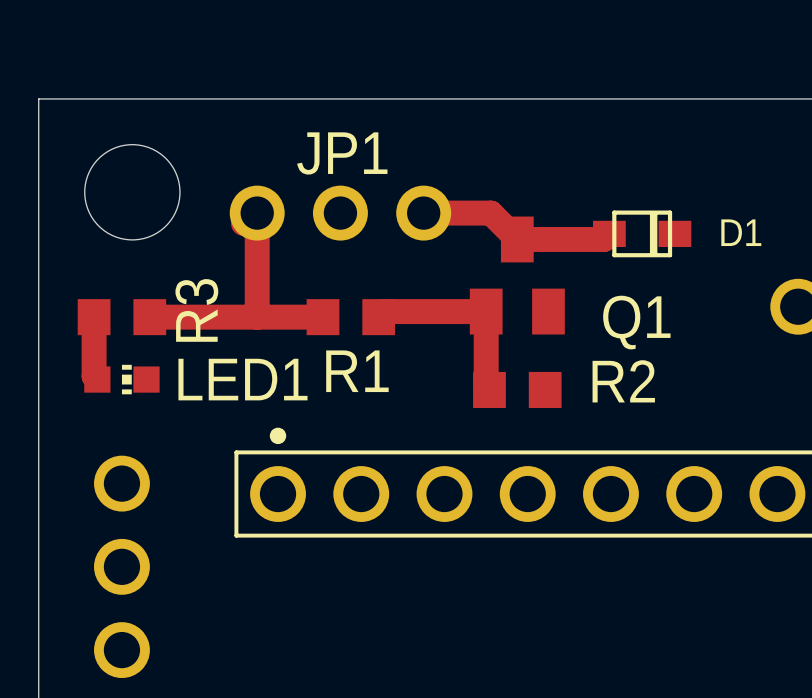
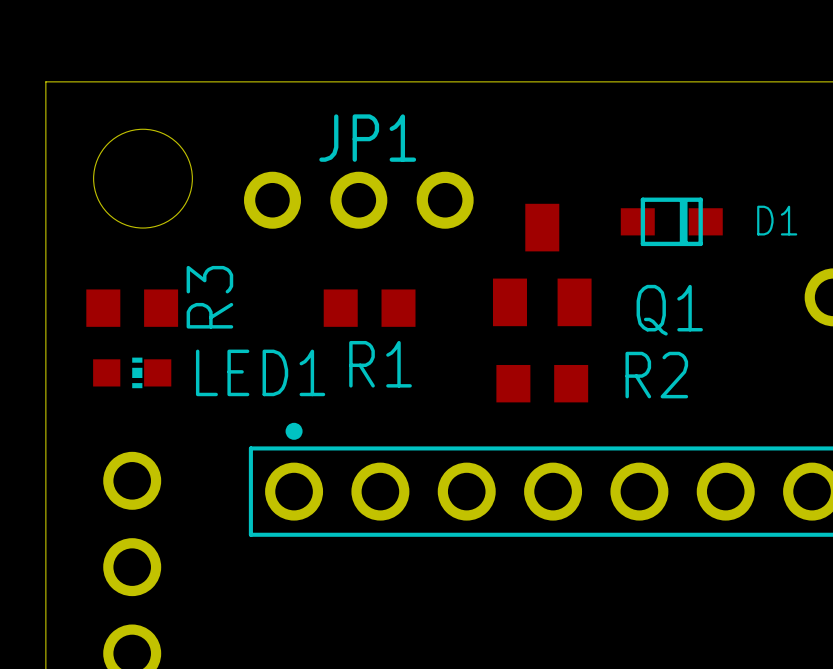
track: (423, 213) (490, 213) (517, 239) (603, 239) (609, 233) -> none
track: (243, 223) (246, 223) (257, 213) (257, 317) -> none
track: (94, 317) (94, 376) (97, 379) -> none
track: (149, 317) (323, 317) -> none
track: (378, 317) (384, 311) (486, 311) (486, 386) (489, 389) -> none

